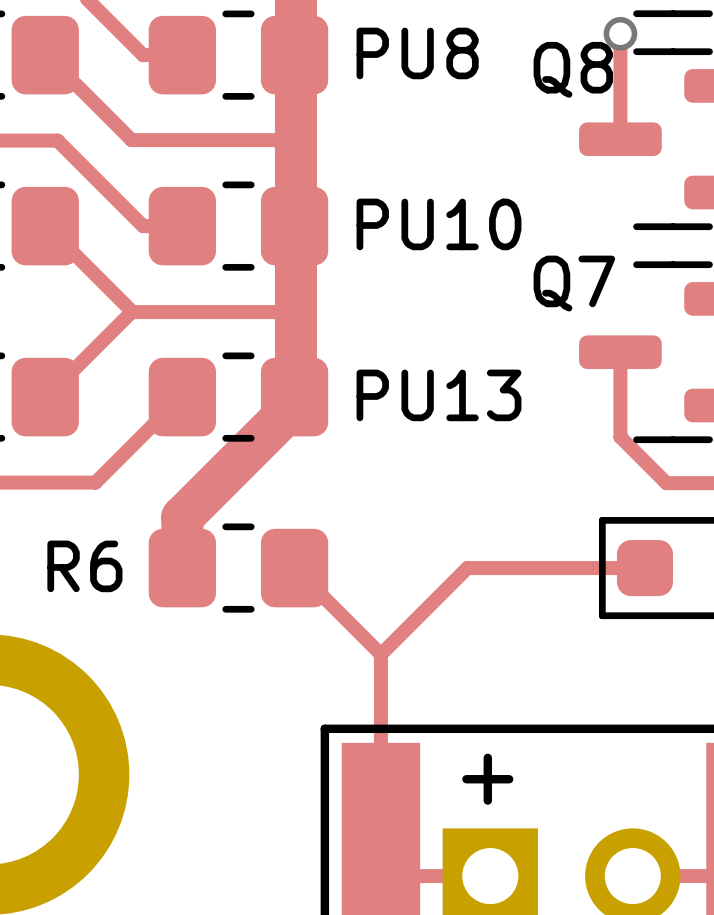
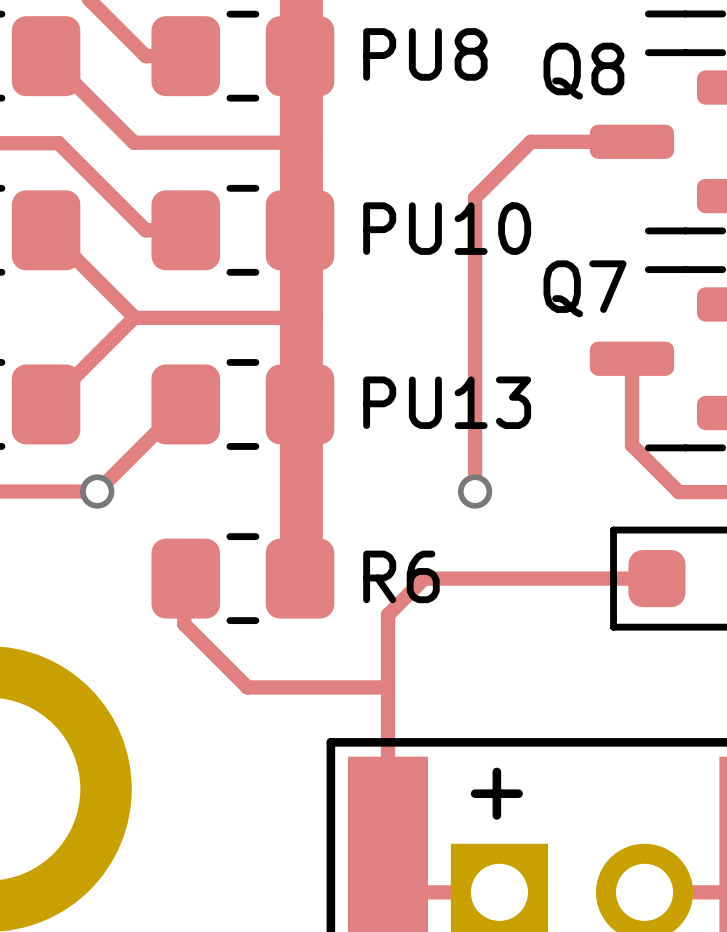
via: (620, 33) -> none
track: (623, 33) (620, 36) (620, 139) -> none
track: none -> (599, 141) (530, 141) (475, 197) (475, 491)
track: none -> (301, 404) (301, 578)
track: (294, 405) (182, 517) (182, 568) -> (388, 687) (247, 687) (184, 624) (184, 578)
via: none -> (97, 491)
via: none -> (475, 491)
R6 name position: R6 (84, 566) -> R6 (401, 576)
track: (294, 568) (380, 654) (467, 568) -> (388, 666) (388, 614) (424, 578) (476, 578)

